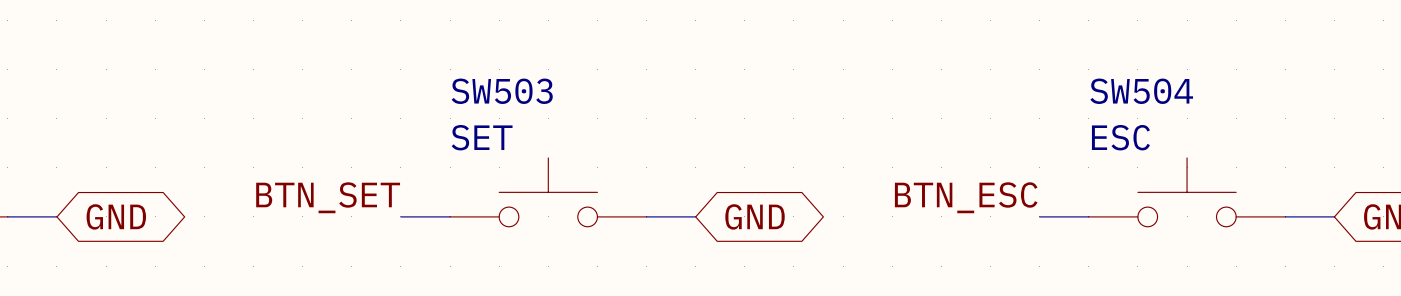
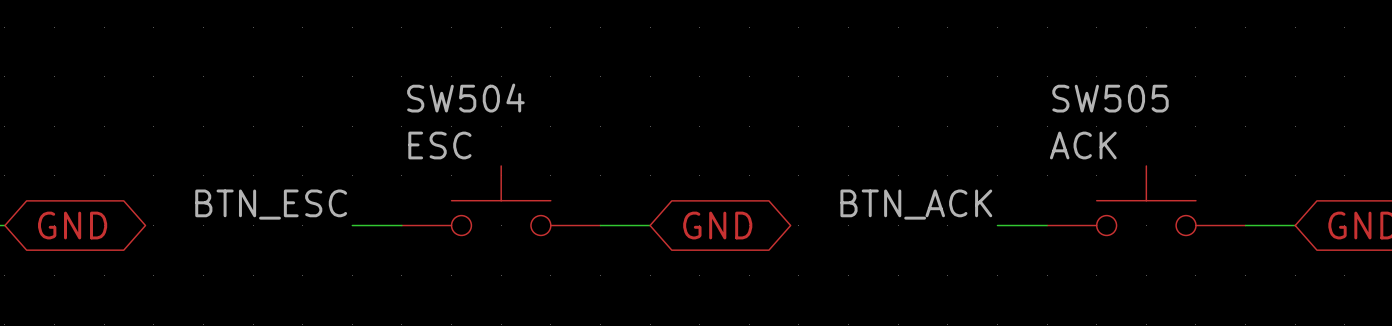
SW503 name: SW503 (502, 91) -> SW504 (465, 98)
SW504 name: SW504 (1141, 91) -> SW505 (1110, 98)
SW503 value: SET (482, 137) -> ESC (439, 145)
SW504 value: ESC (1120, 137) -> ACK (1083, 145)
label: BTN_SET (328, 197) -> BTN_ESC (271, 204)
label: BTN_ESC (966, 197) -> BTN_ACK (916, 204)

